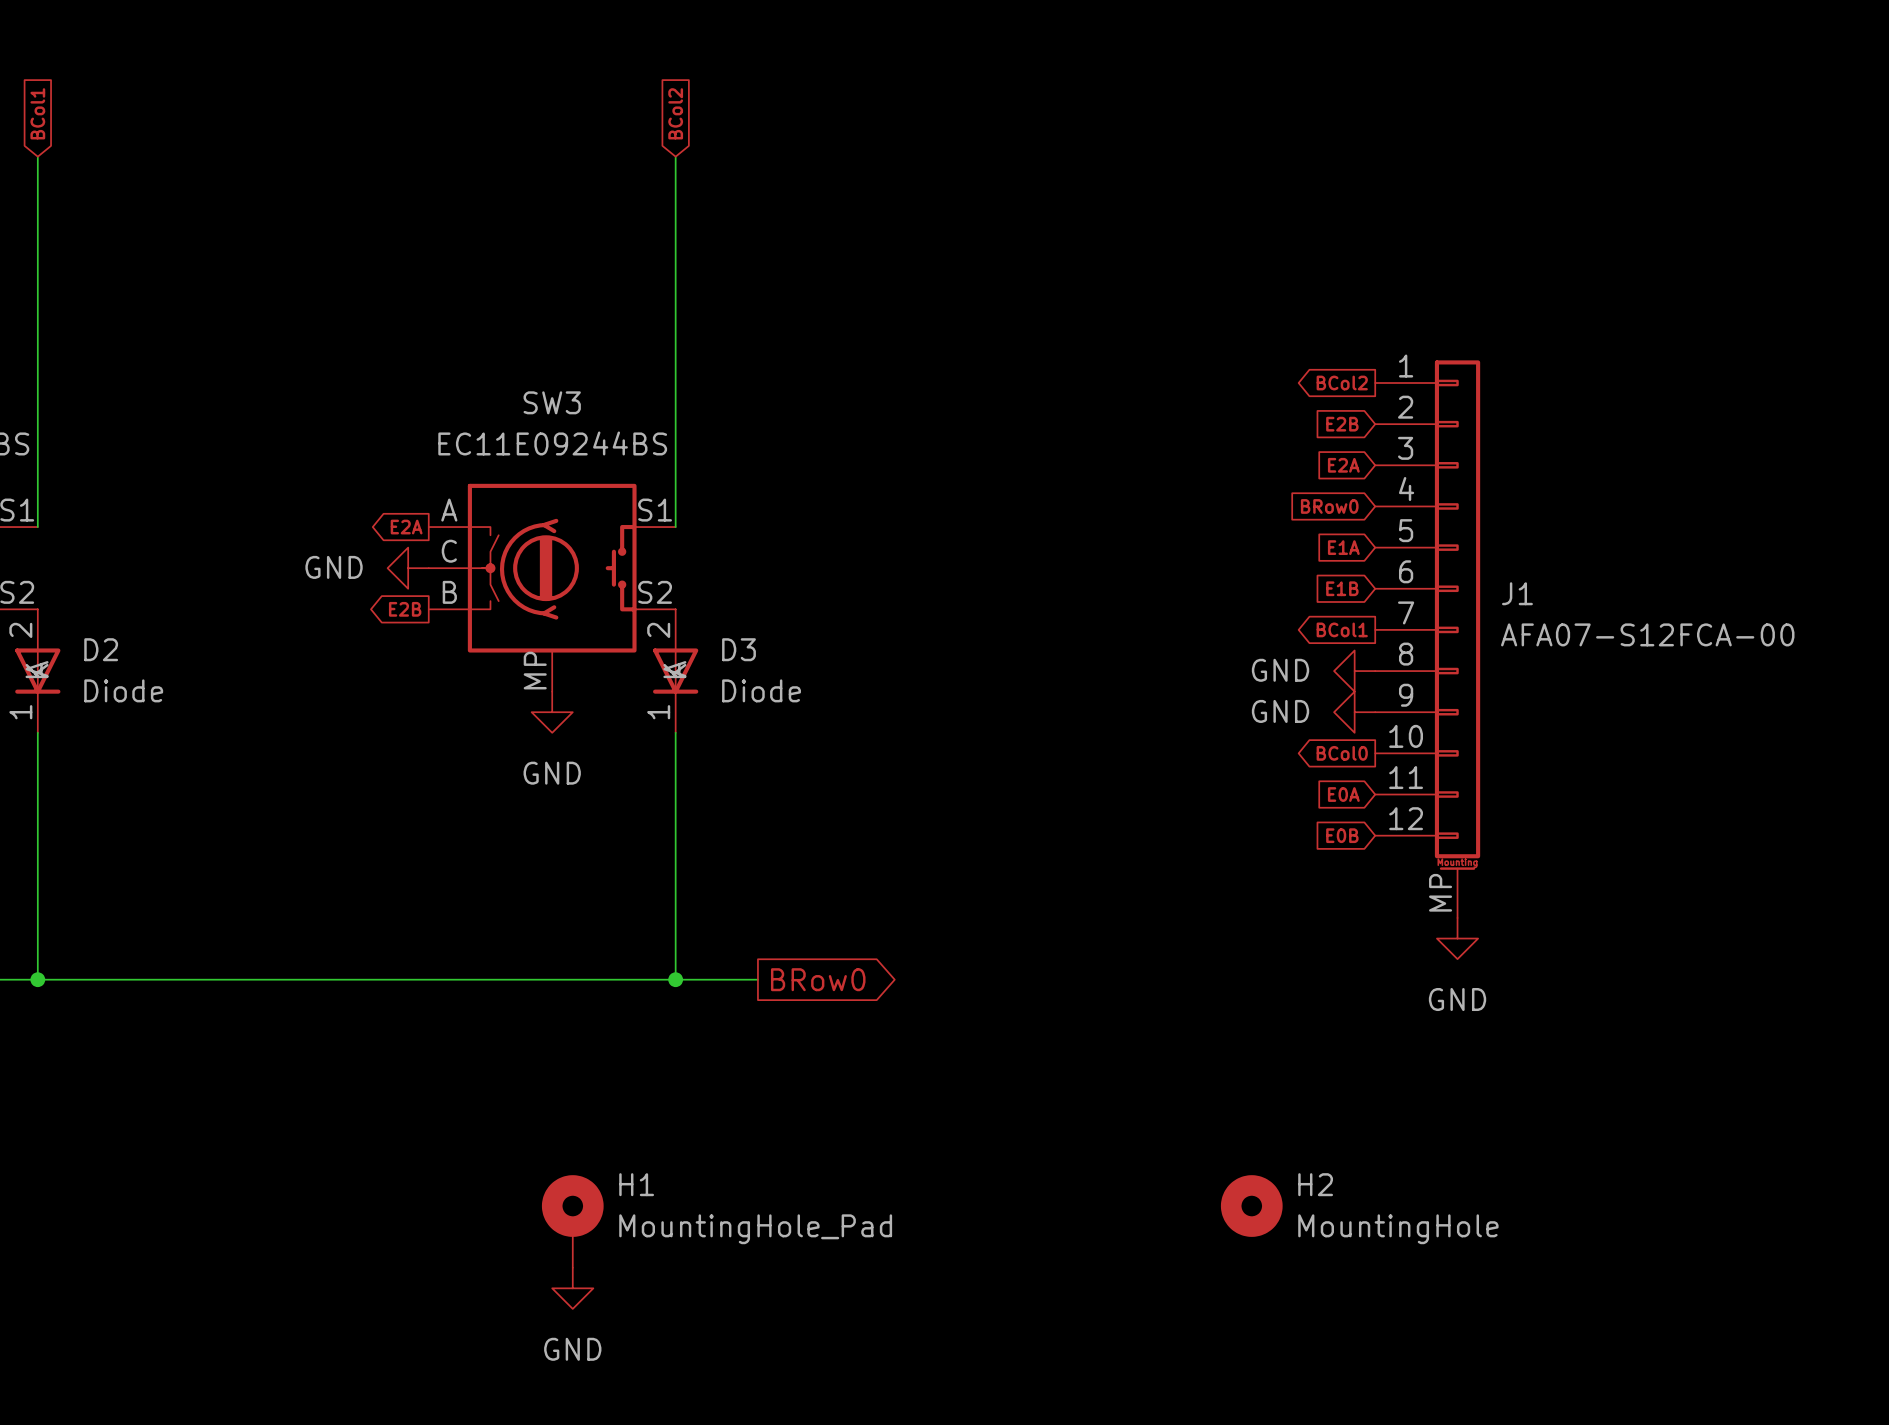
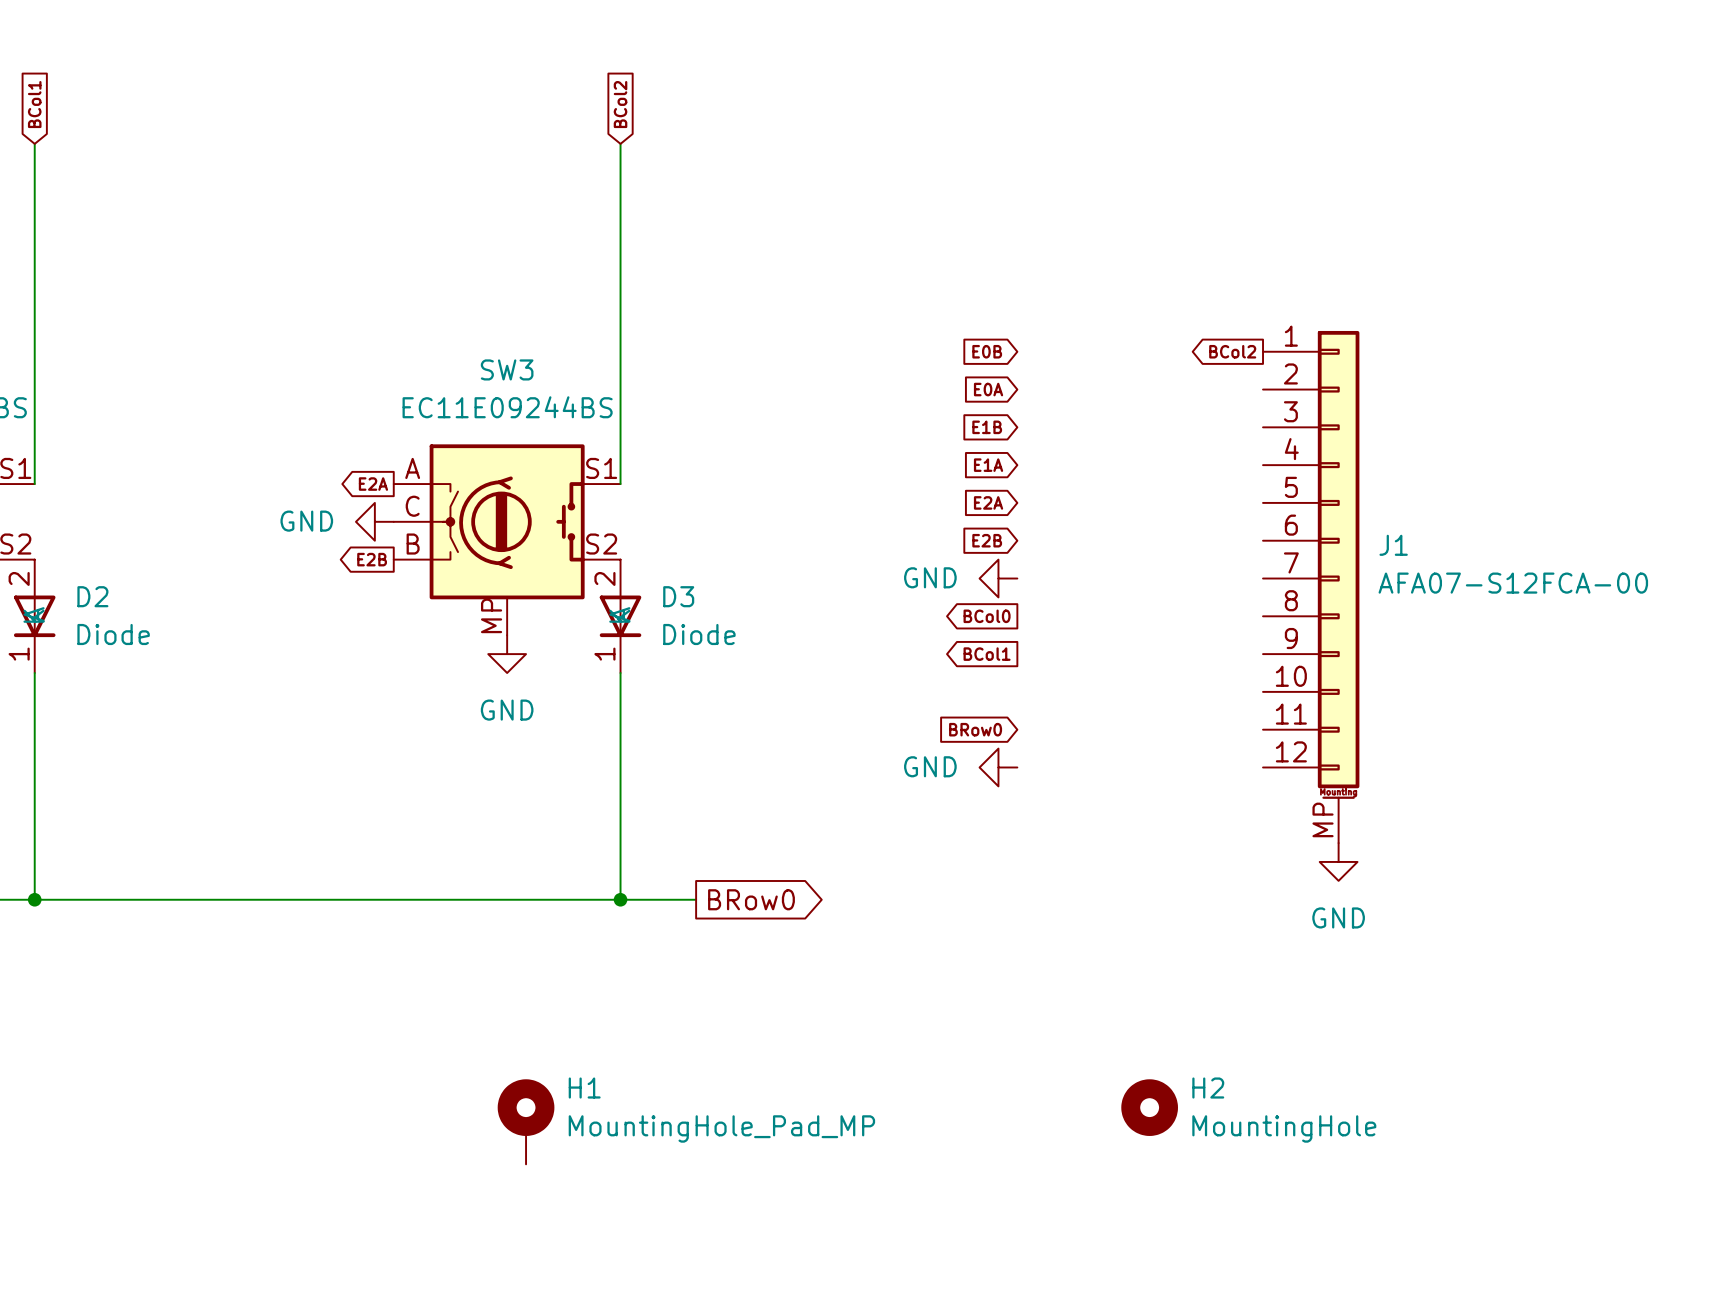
global label: none -> E0B (987, 351)
global label: none -> E0A (988, 389)
global label position: E2B (1342, 424) -> E2B (987, 540)
global label position: E2A (1343, 465) -> E2A (988, 502)
global label position: BRow0 (1329, 506) -> BRow0 (975, 729)
global label position: E1A (1343, 547) -> E1A (988, 465)
global label position: E1B (1342, 588) -> E1B (987, 427)
power symbol: none -> GND (998, 578)
global label position: BCol1 (1342, 629) -> BCol1 (987, 654)
power symbol: GND (1354, 671) -> none
power symbol: GND (1354, 712) -> none
global label position: BCol0 (1342, 753) -> BCol0 (987, 616)
global label: E0A (1343, 794) -> none
power symbol: none -> GND (998, 767)
global label: E0B (1342, 835) -> none
H1 value: MountingHole_Pad (755, 1229) -> MountingHole_Pad_MP (721, 1128)
power symbol: GND (572, 1288) -> none

